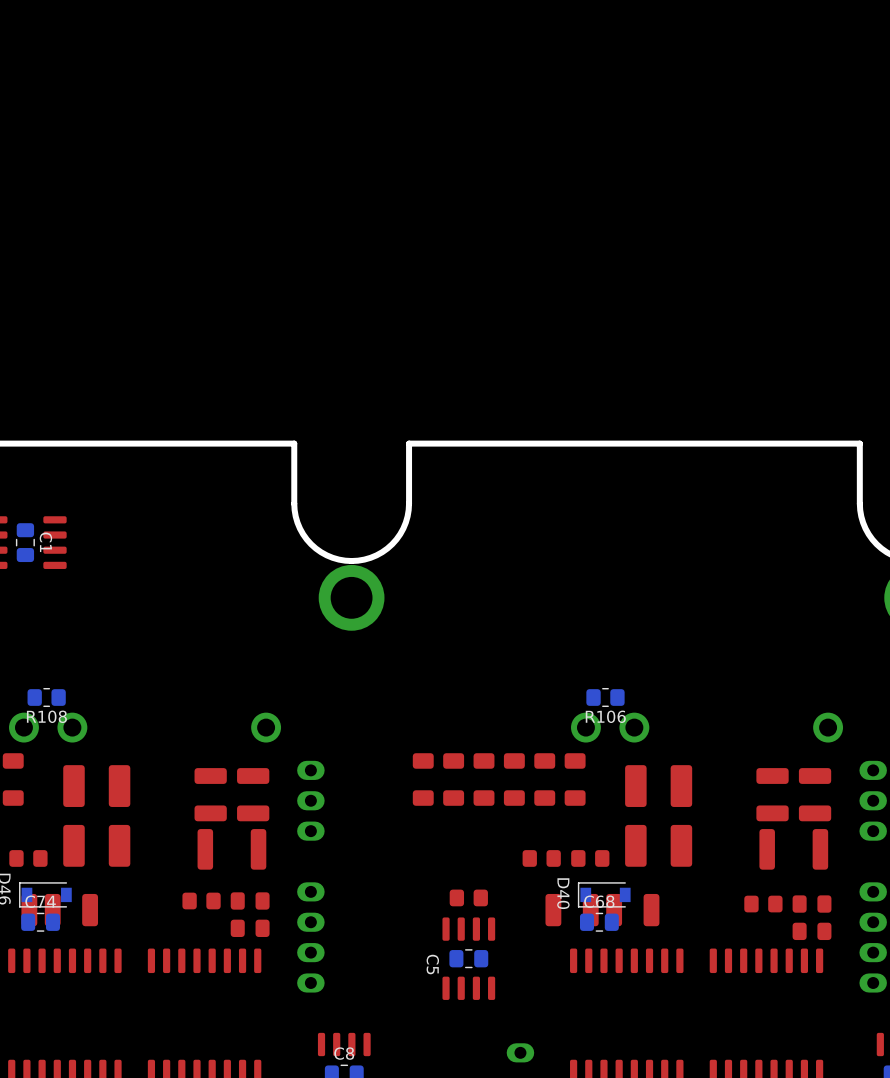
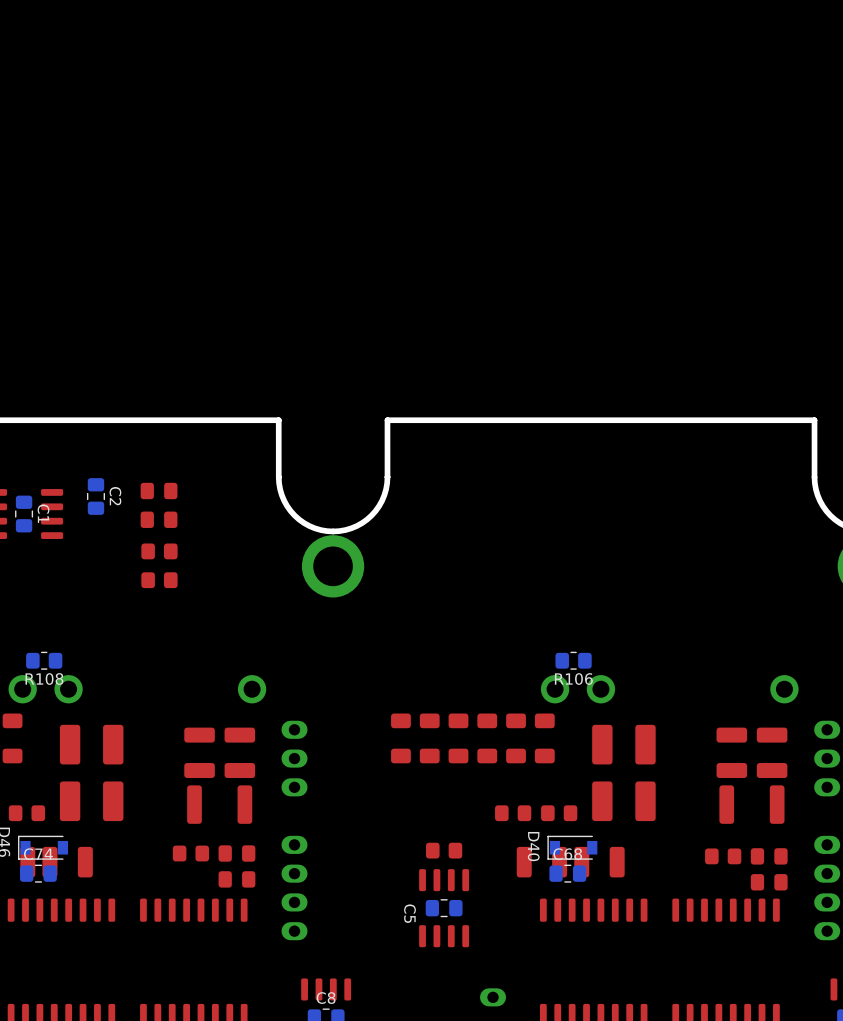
part: none -> (159, 490)
C2: none -> (95, 496)
part: none -> (159, 519)
part: none -> (159, 551)
part: none -> (159, 580)

